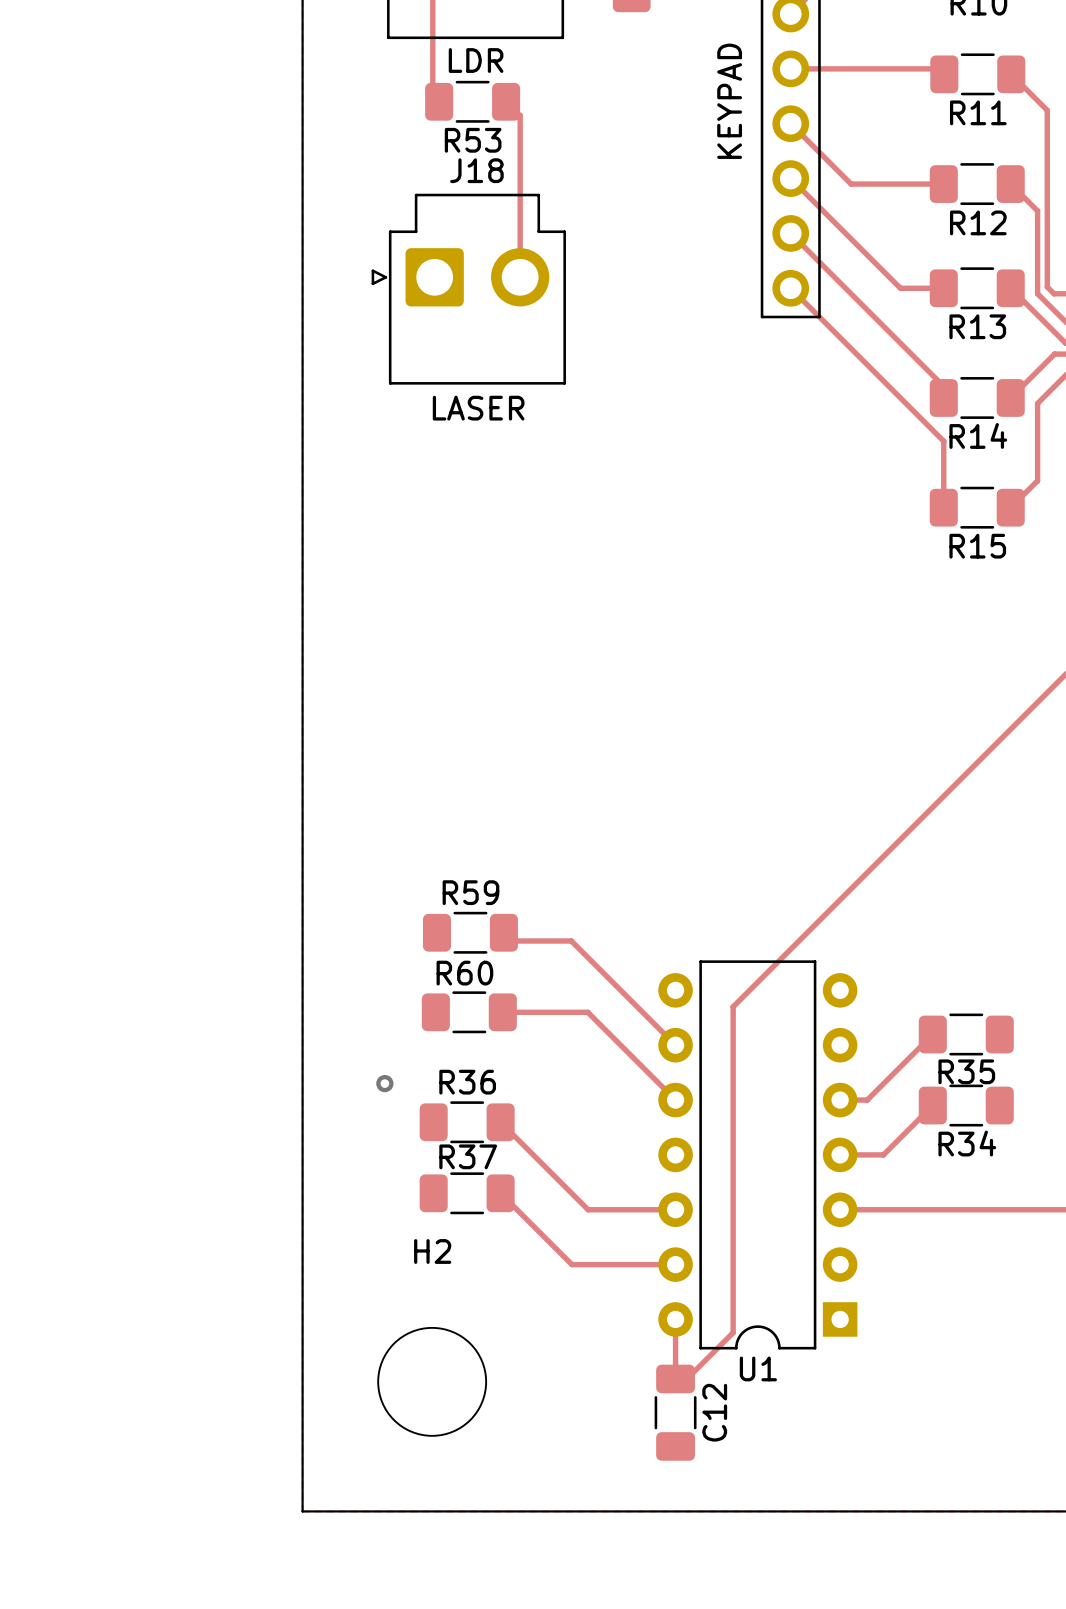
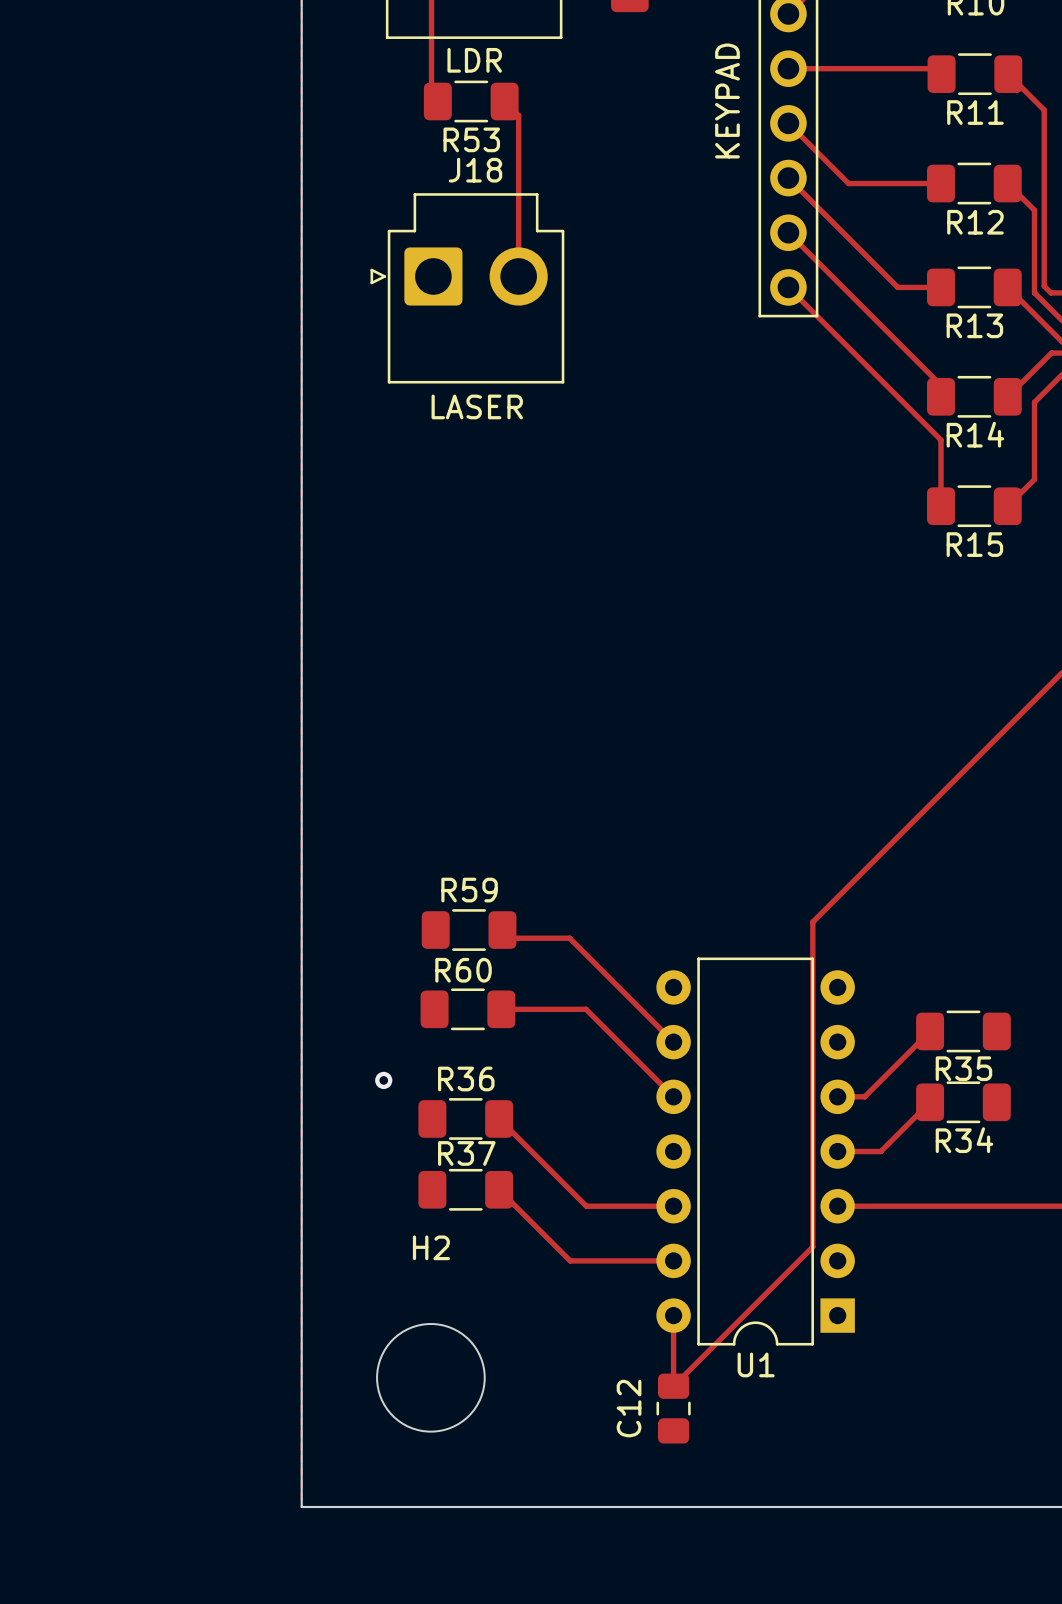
track: (815, 924) (733, 1006) (733, 1332) -> (812, 922) (812, 1247) (731, 1328)
C12 footprint: [654, 1364, 697, 1461] -> [656, 1373, 691, 1444]
C12 name position: C12 (714, 1412) -> C12 (629, 1408)

